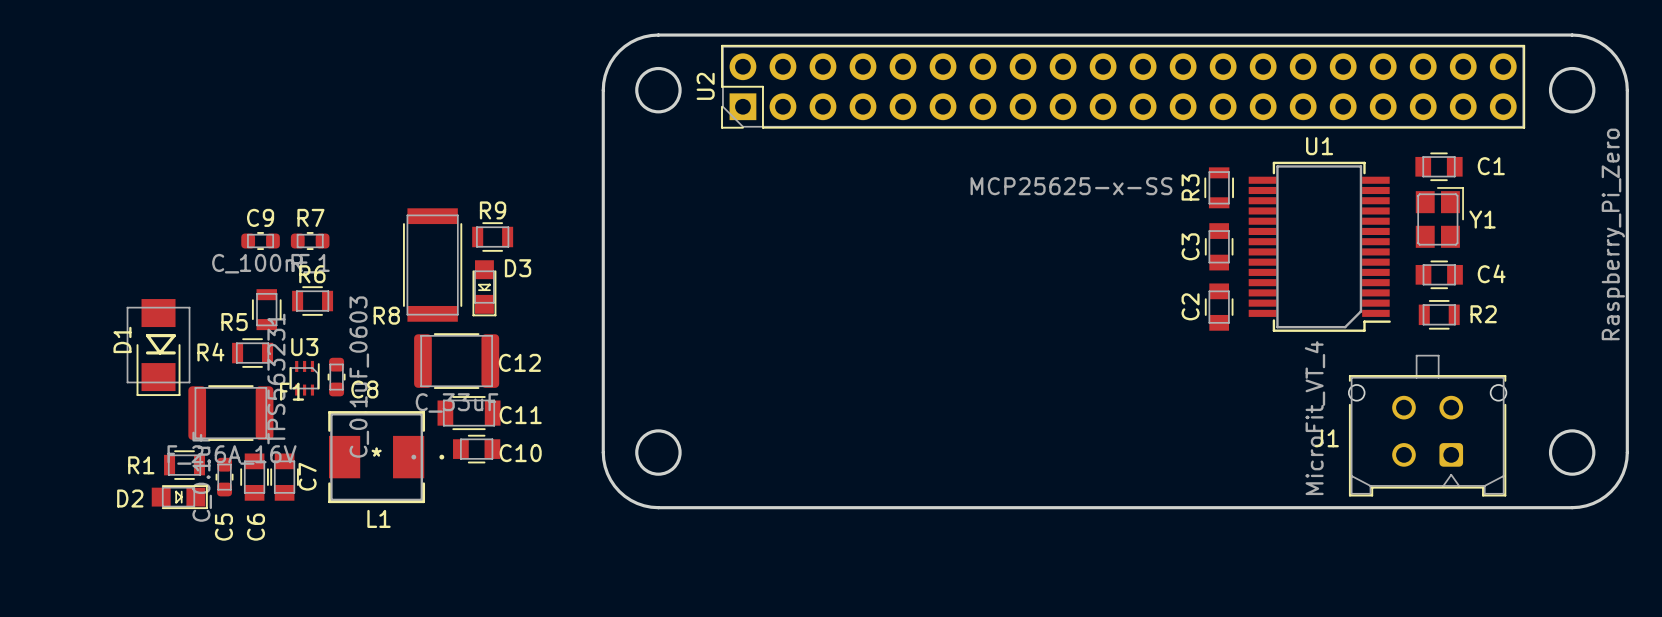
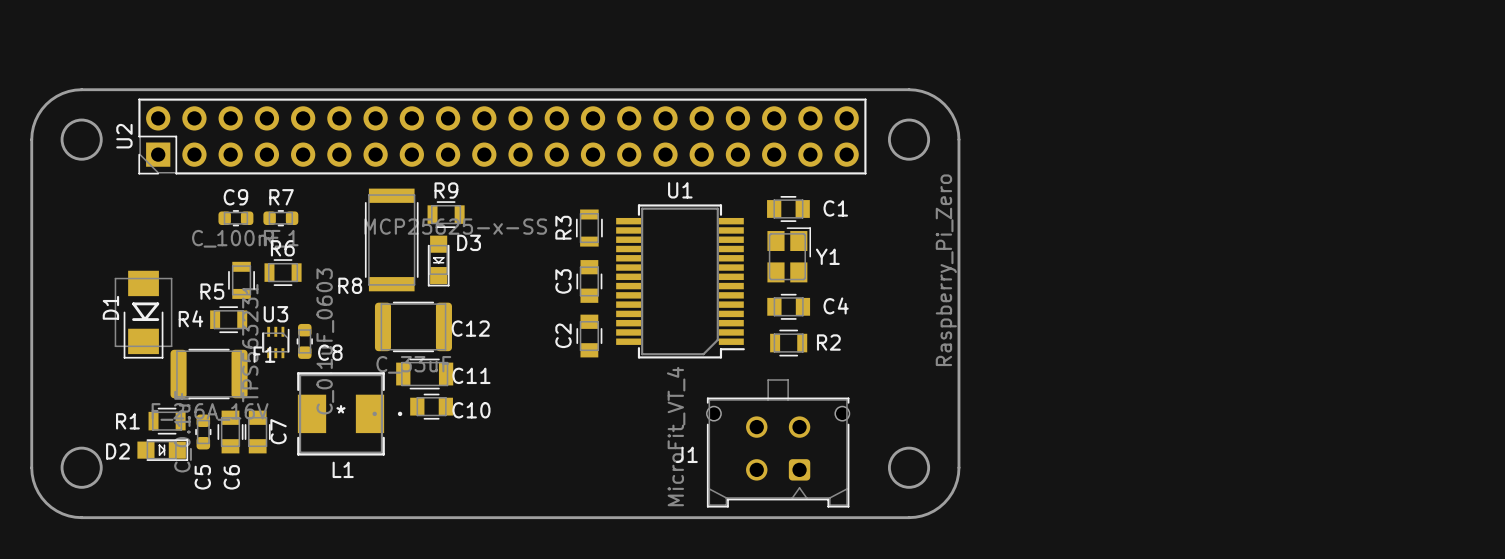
board edge: (658, 35) (1572, 35) (1593, 39) (1605, 46) (1615, 56) (1623, 69) (1626, 82) (1627, 452) (1623, 473) (1615, 486) (1605, 496) (1586, 505) (1572, 507) (658, 507) (637, 503) (624, 496) (614, 486) (607, 473) (603, 459) (603, 90) (607, 69) (619, 51) (637, 39) (658, 35) -> none
round board edge: [635, 66, 682, 114] -> none
round board edge: [1548, 66, 1596, 114] -> none
U2 position: (1123, 86) -> (502, 136)
board edge: none -> (81, 89) (909, 89) (928, 93) (939, 100) (948, 109) (955, 120) (958, 133) (958, 467) (955, 486) (948, 498) (939, 507) (921, 515) (909, 517) (81, 517) (62, 513) (51, 507) (42, 498) (35, 486) (32, 474) (31, 139) (35, 120) (46, 104) (62, 93) (81, 89)
round board edge: none -> [60, 118, 103, 161]
round board edge: none -> [888, 118, 931, 161]
C1 position: (1438, 166) -> (788, 208)
R3 position: (1219, 187) -> (589, 228)
Y1 position: (1439, 217) -> (789, 254)
C3 position: (1219, 246) -> (589, 281)
U1 position: (1319, 246) -> (680, 281)
C4 position: (1439, 274) -> (788, 306)
C2 position: (1219, 307) -> (589, 336)
R2 position: (1439, 314) -> (788, 343)
J1 position: (1427, 425) -> (778, 443)
round board edge: [635, 429, 682, 476] -> none
round board edge: [1548, 429, 1596, 476] -> none
round board edge: none -> [60, 446, 103, 489]
round board edge: none -> [888, 446, 931, 489]

